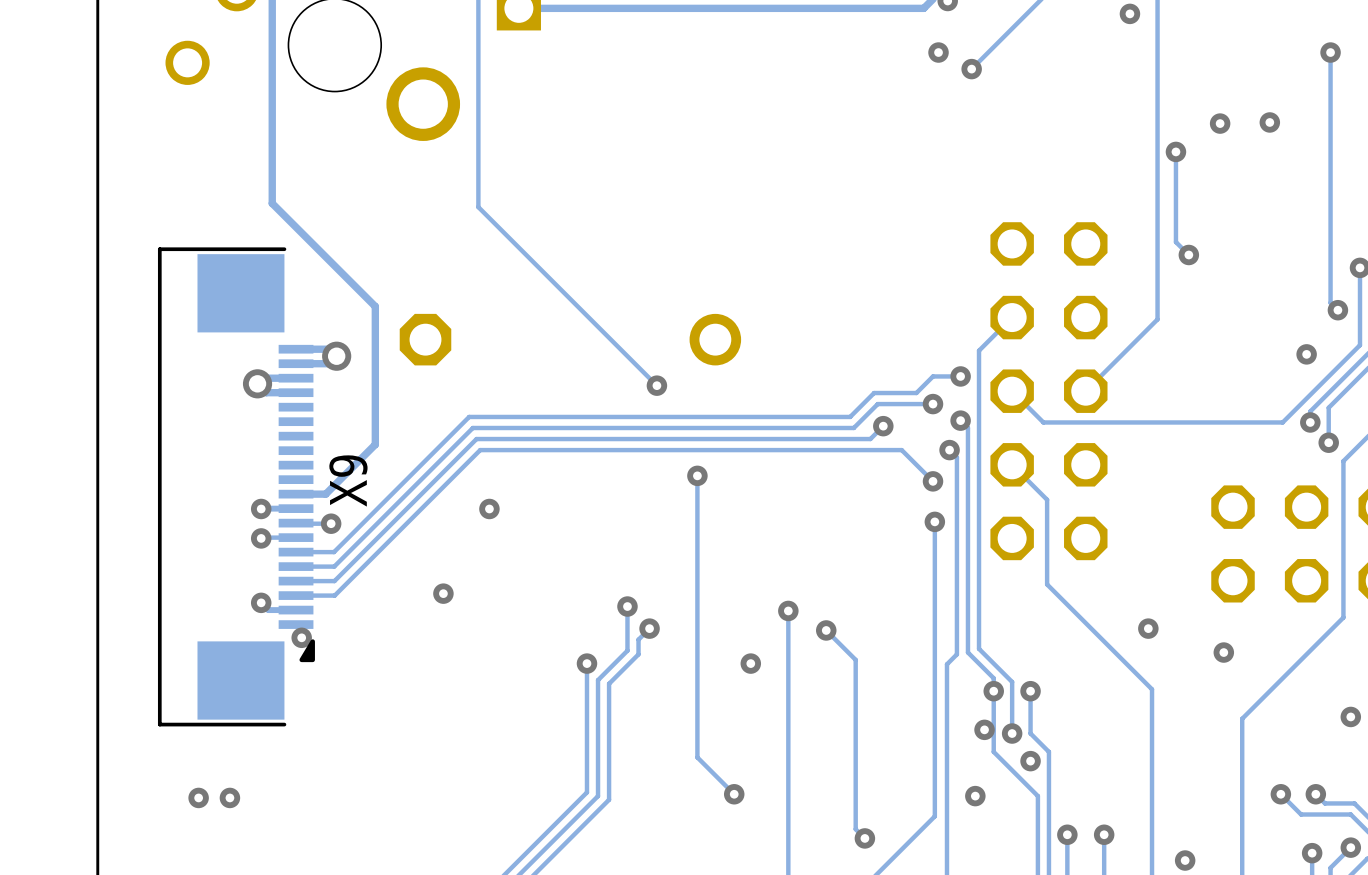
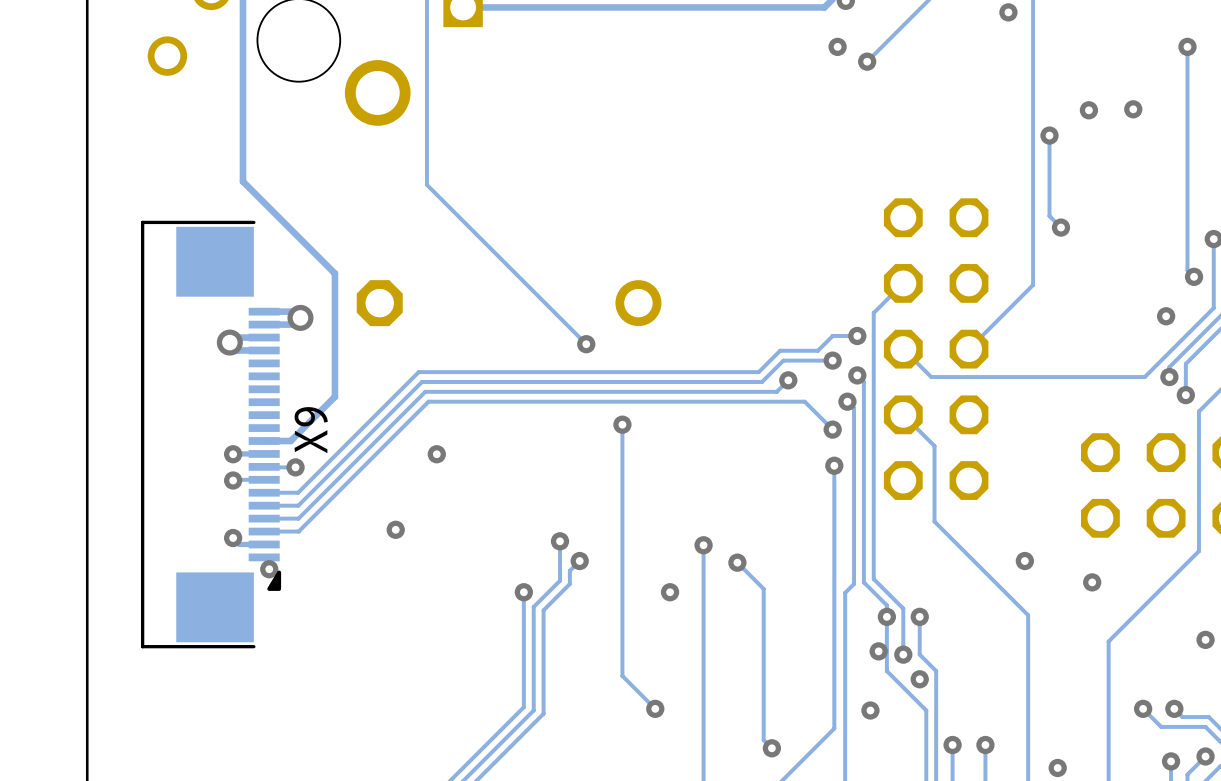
via: (198, 797) -> none
via: (229, 797) -> none

